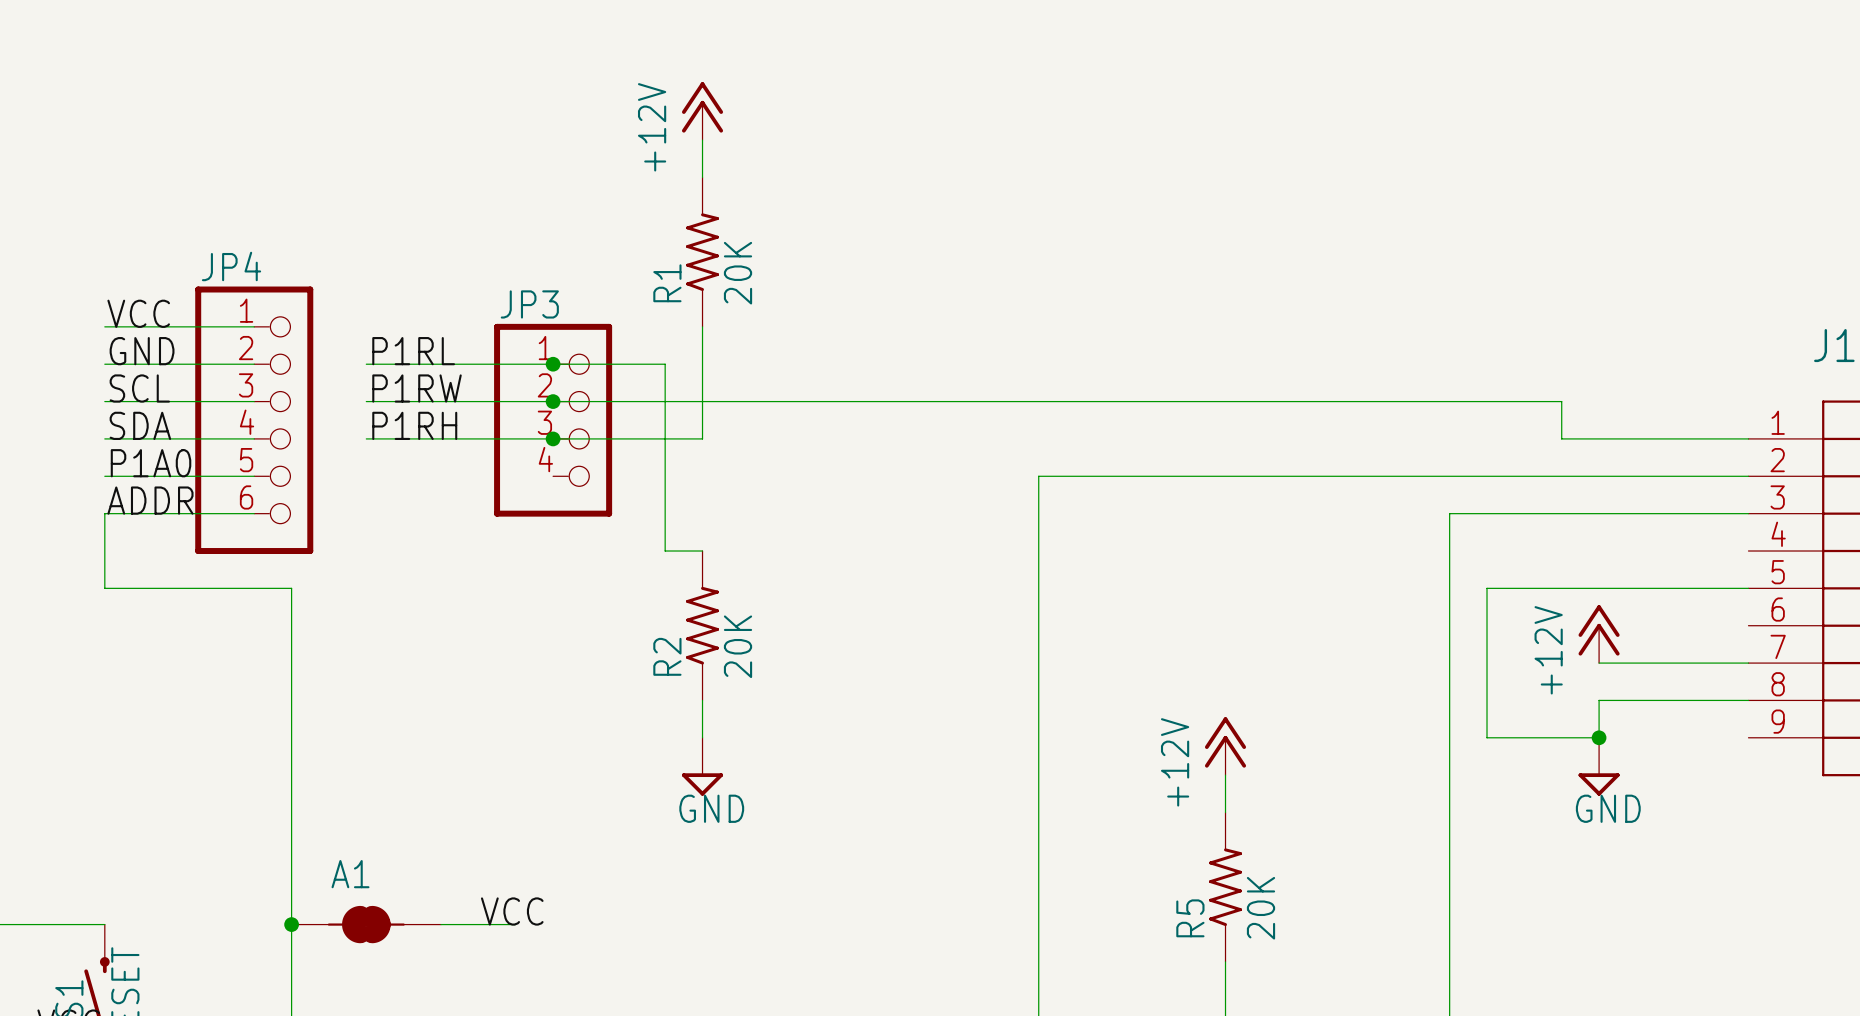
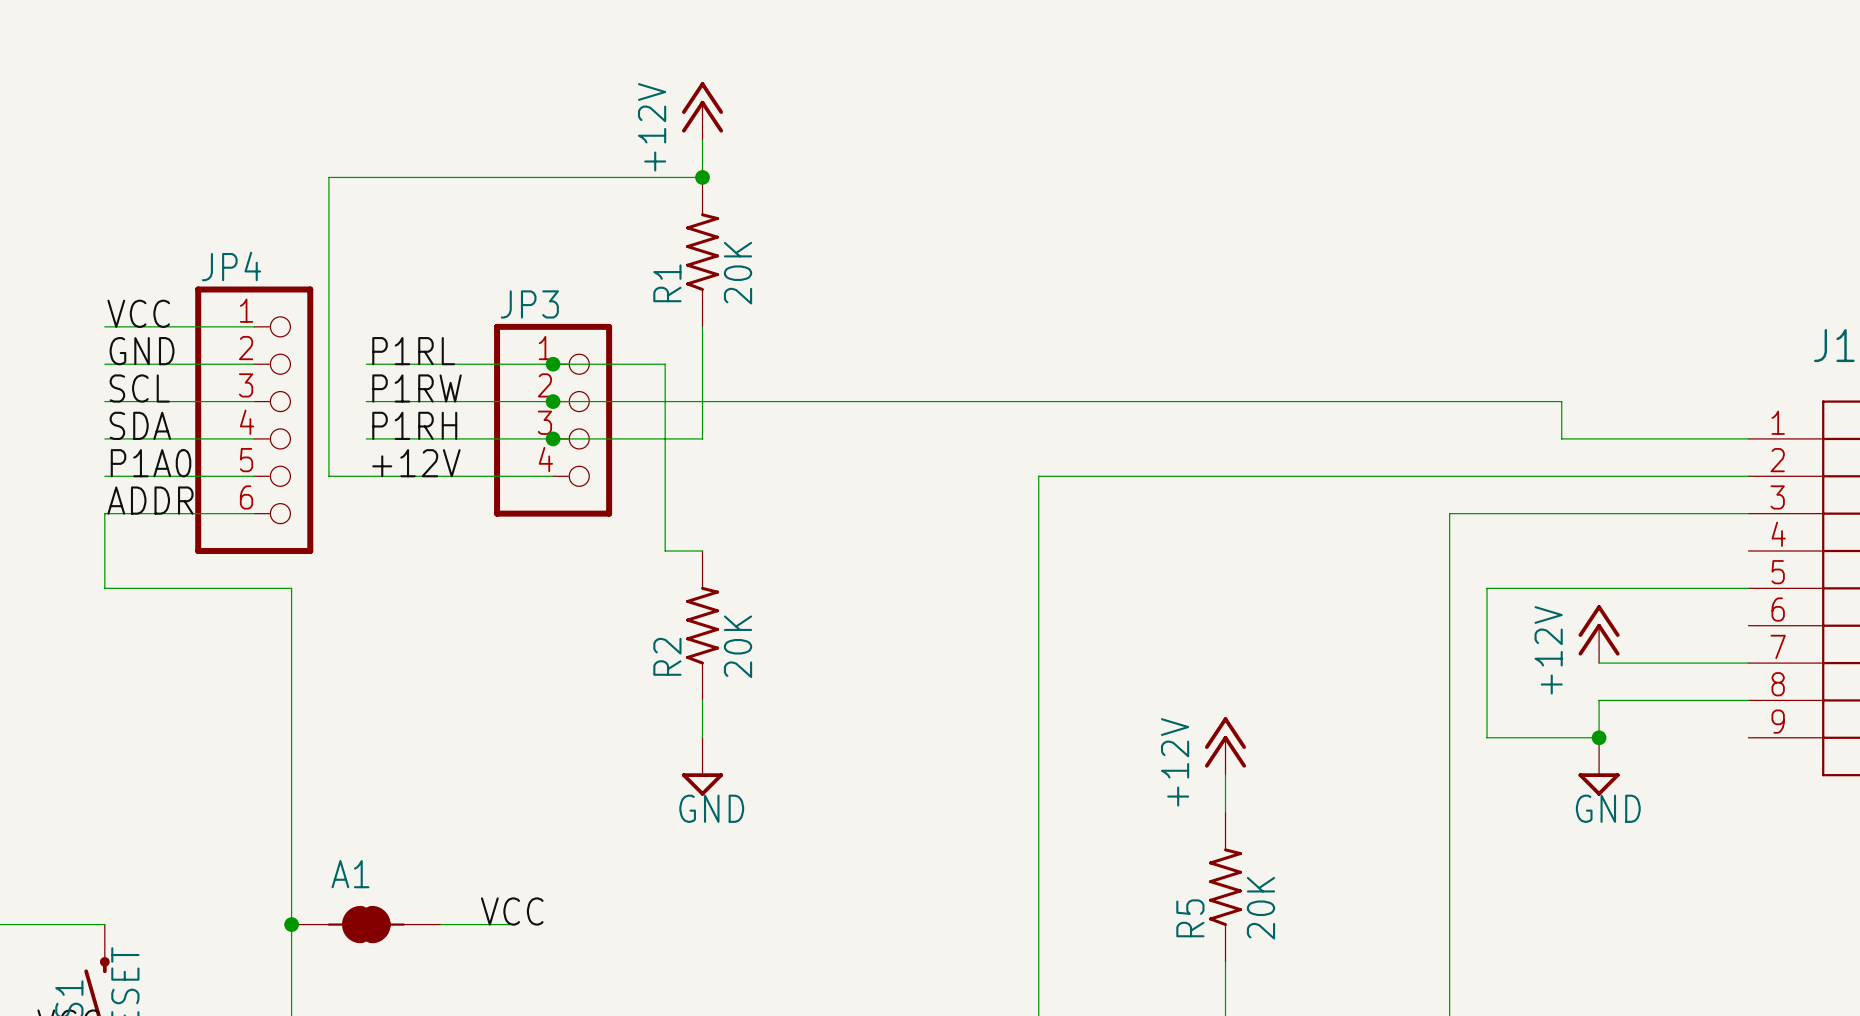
wire: none -> (702, 177) (328, 177) (328, 476) (553, 476)
junction: none -> (702, 177)
label: none -> +12V (416, 463)

